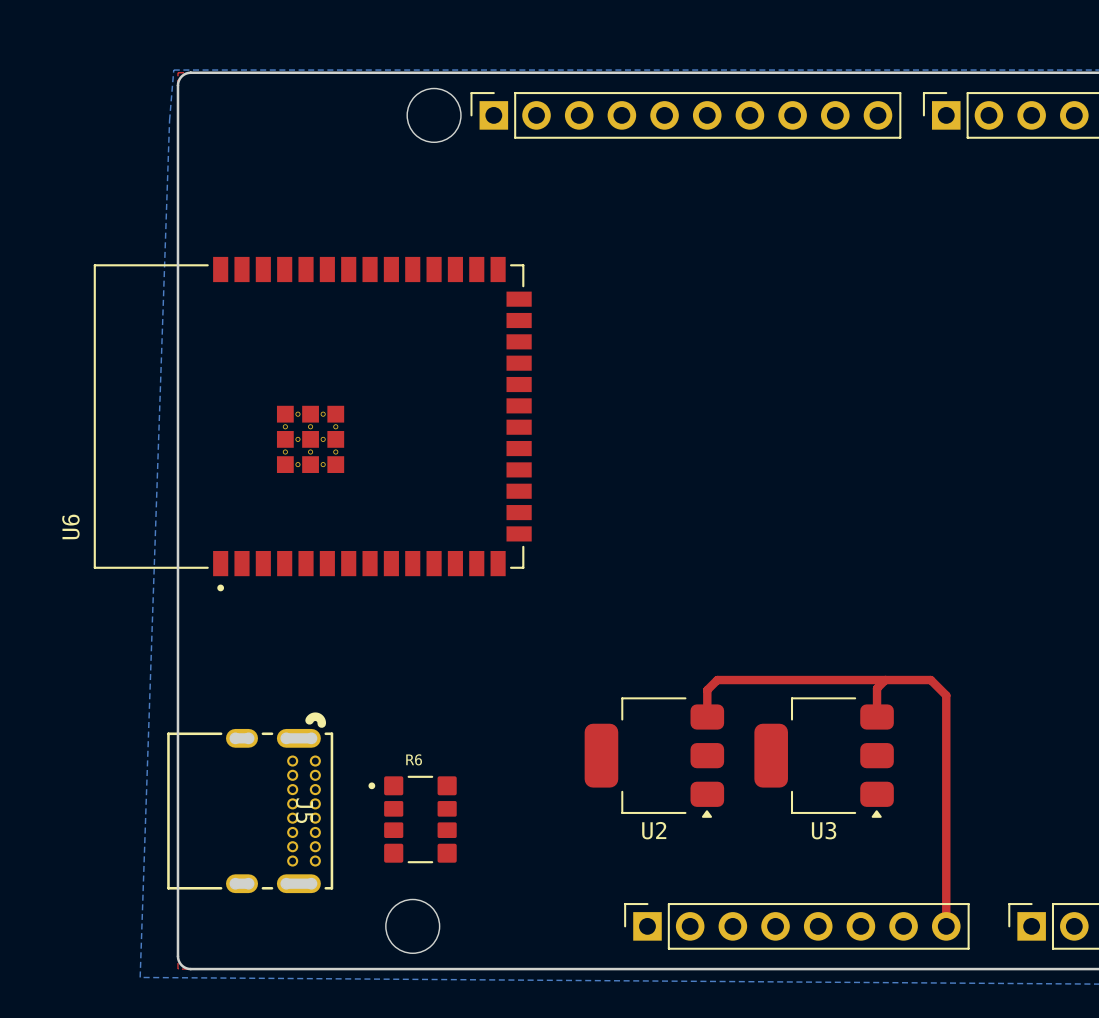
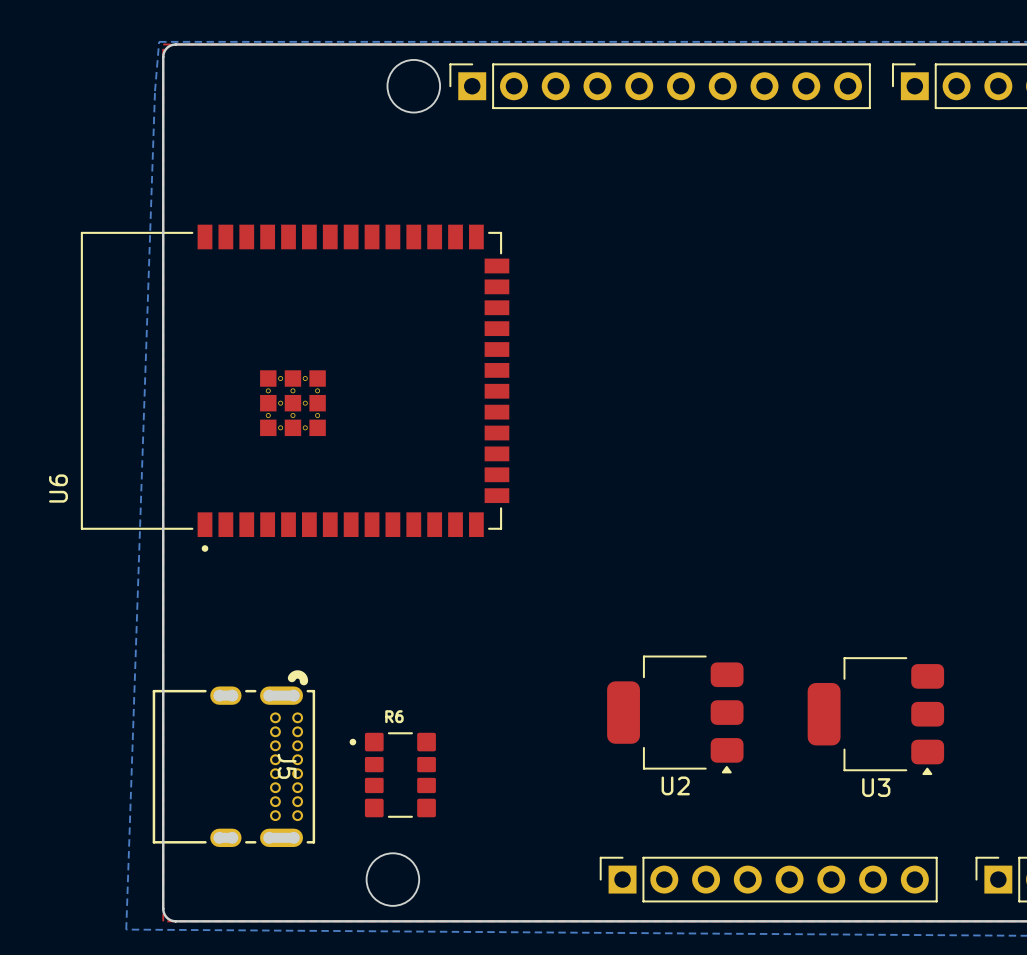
top track: (885, 680) (877, 688) (877, 717) -> none
top track: (707, 717) (707, 690) (717, 680) (930, 680) (946, 695) (946, 926) -> none
U2 position: (654, 757) -> (675, 714)
U3 position: (824, 757) -> (875, 716)

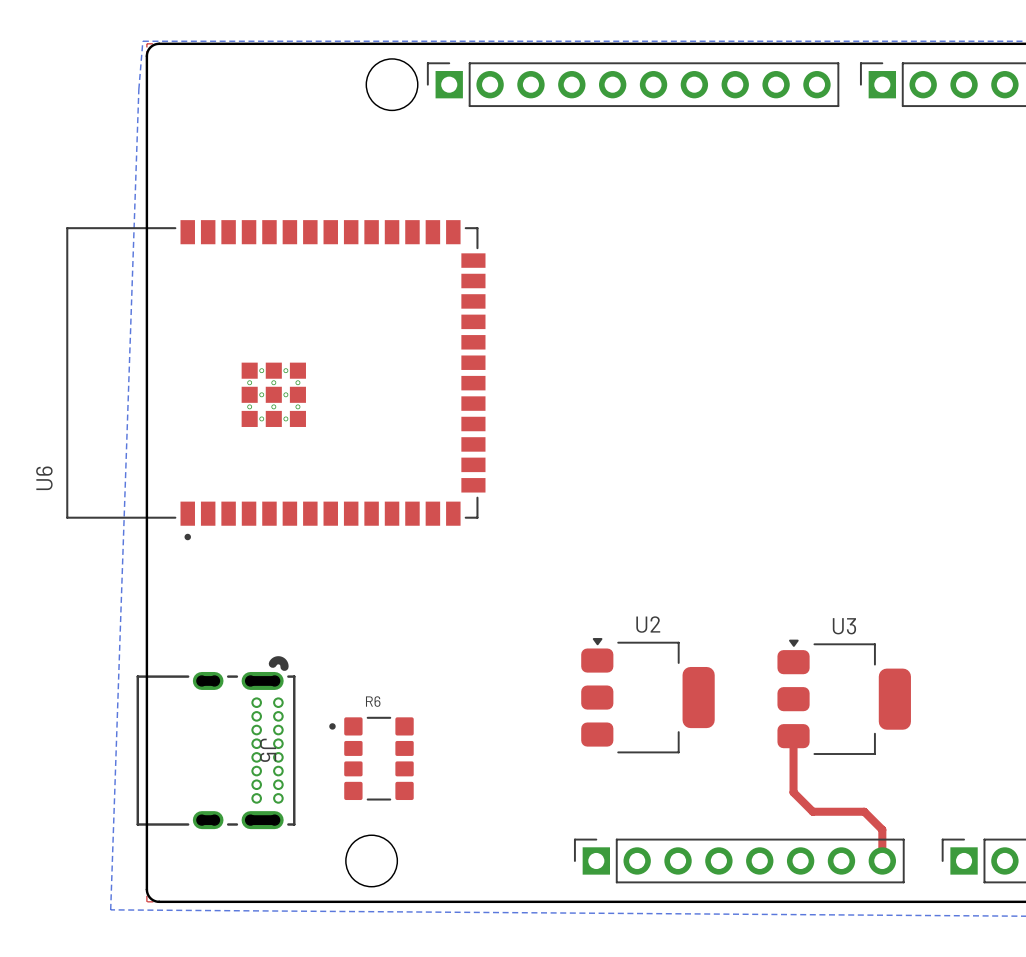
U2 rotation: 0° (675, 714) -> 180° (647, 695)
U3 rotation: 0° (875, 716) -> 180° (844, 697)
top track: none -> (793, 736) (793, 792) (812, 811) (864, 811) (882, 829) (882, 860)

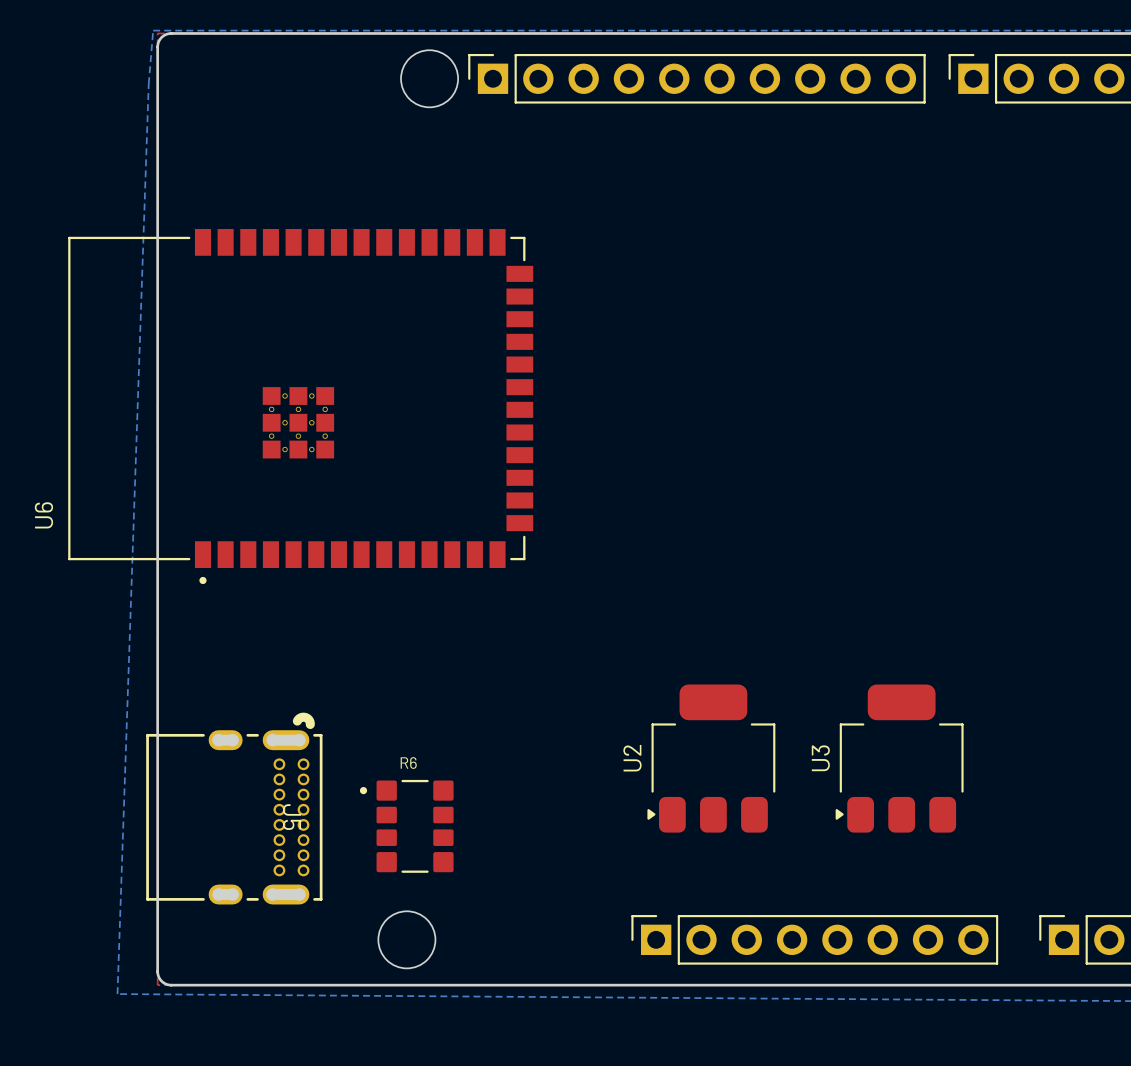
U2 rotation: 0° (647, 695) -> 90° counterclockwise (711, 758)
U3 rotation: 0° (844, 697) -> 90° counterclockwise (899, 758)
top track: (793, 736) (793, 792) (812, 811) (864, 811) (882, 829) (882, 860) -> none

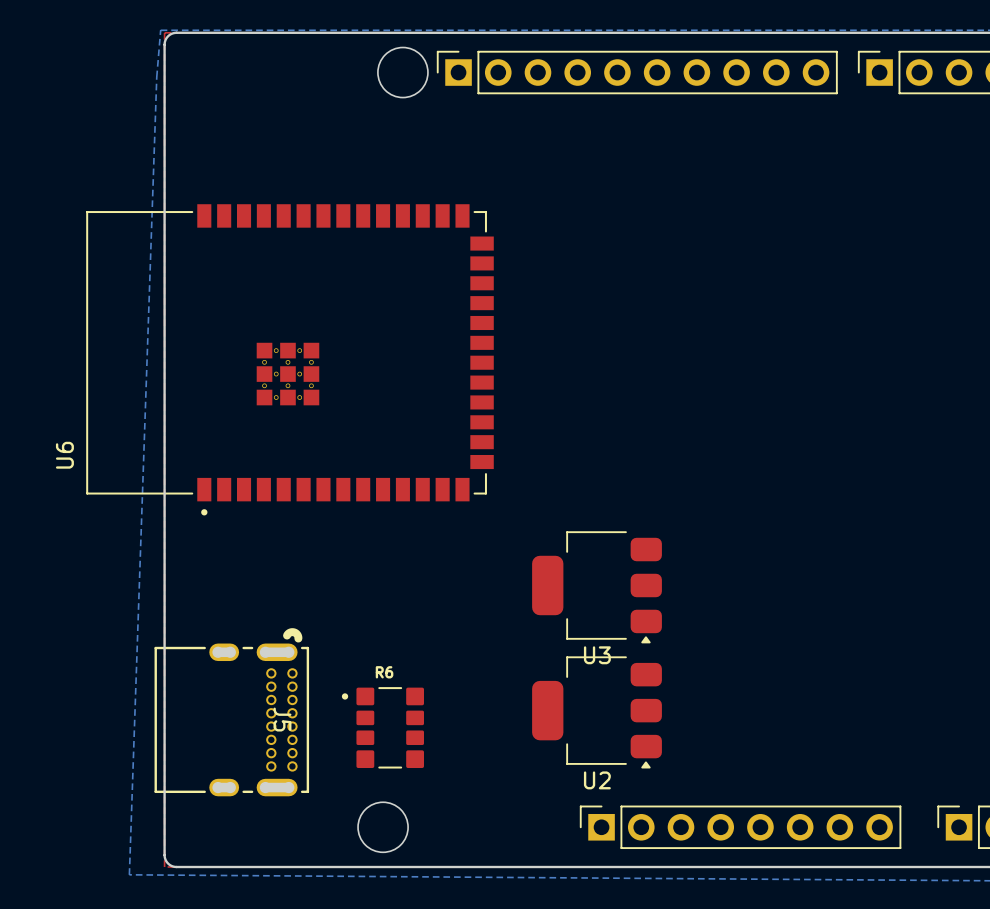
U2 rotation: 0° (711, 758) -> 90° counterclockwise (597, 712)
U3 rotation: 0° (899, 758) -> 90° counterclockwise (597, 587)
U3 position: (899, 758) -> (597, 587)

